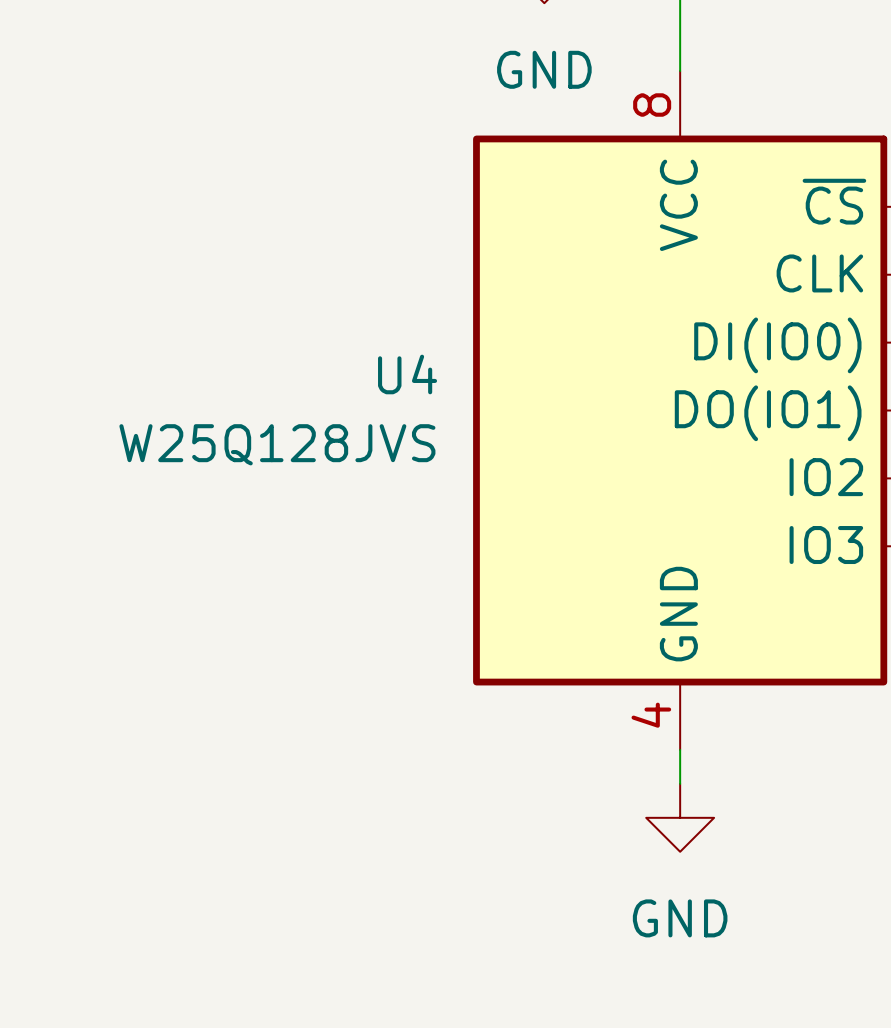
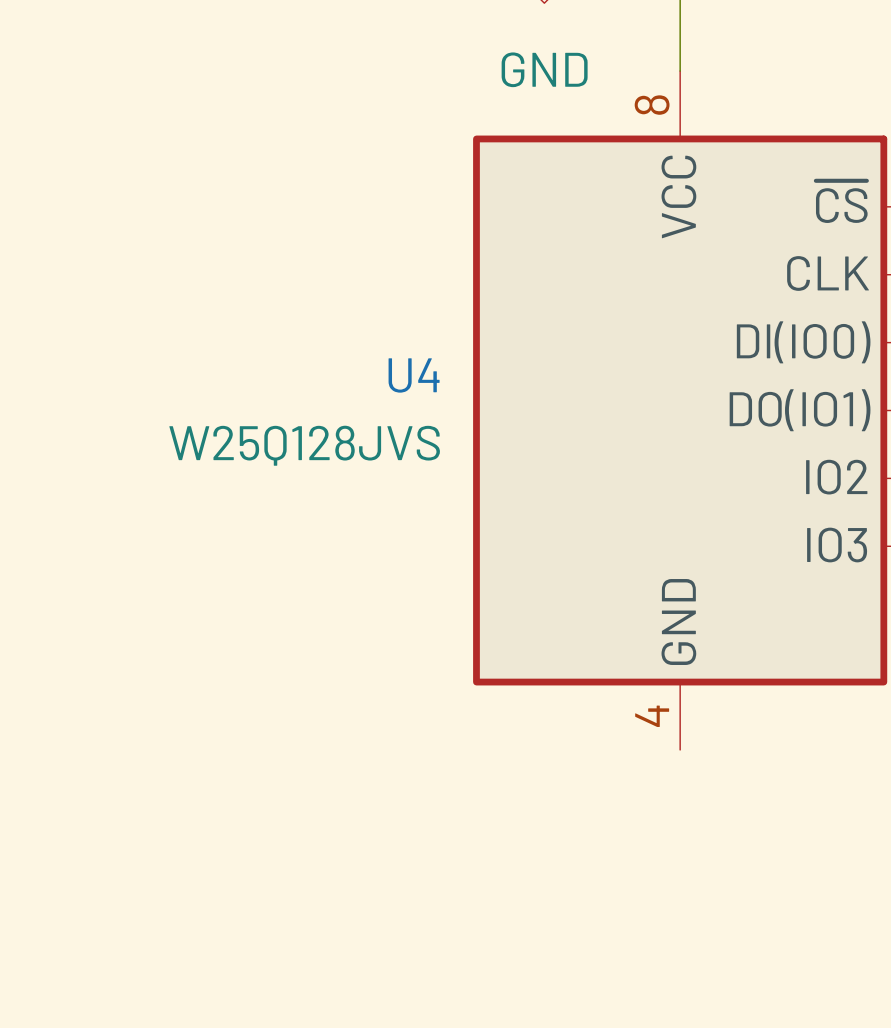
wire: (680, 749) (680, 783) -> none
power symbol: GND (680, 817) -> none

